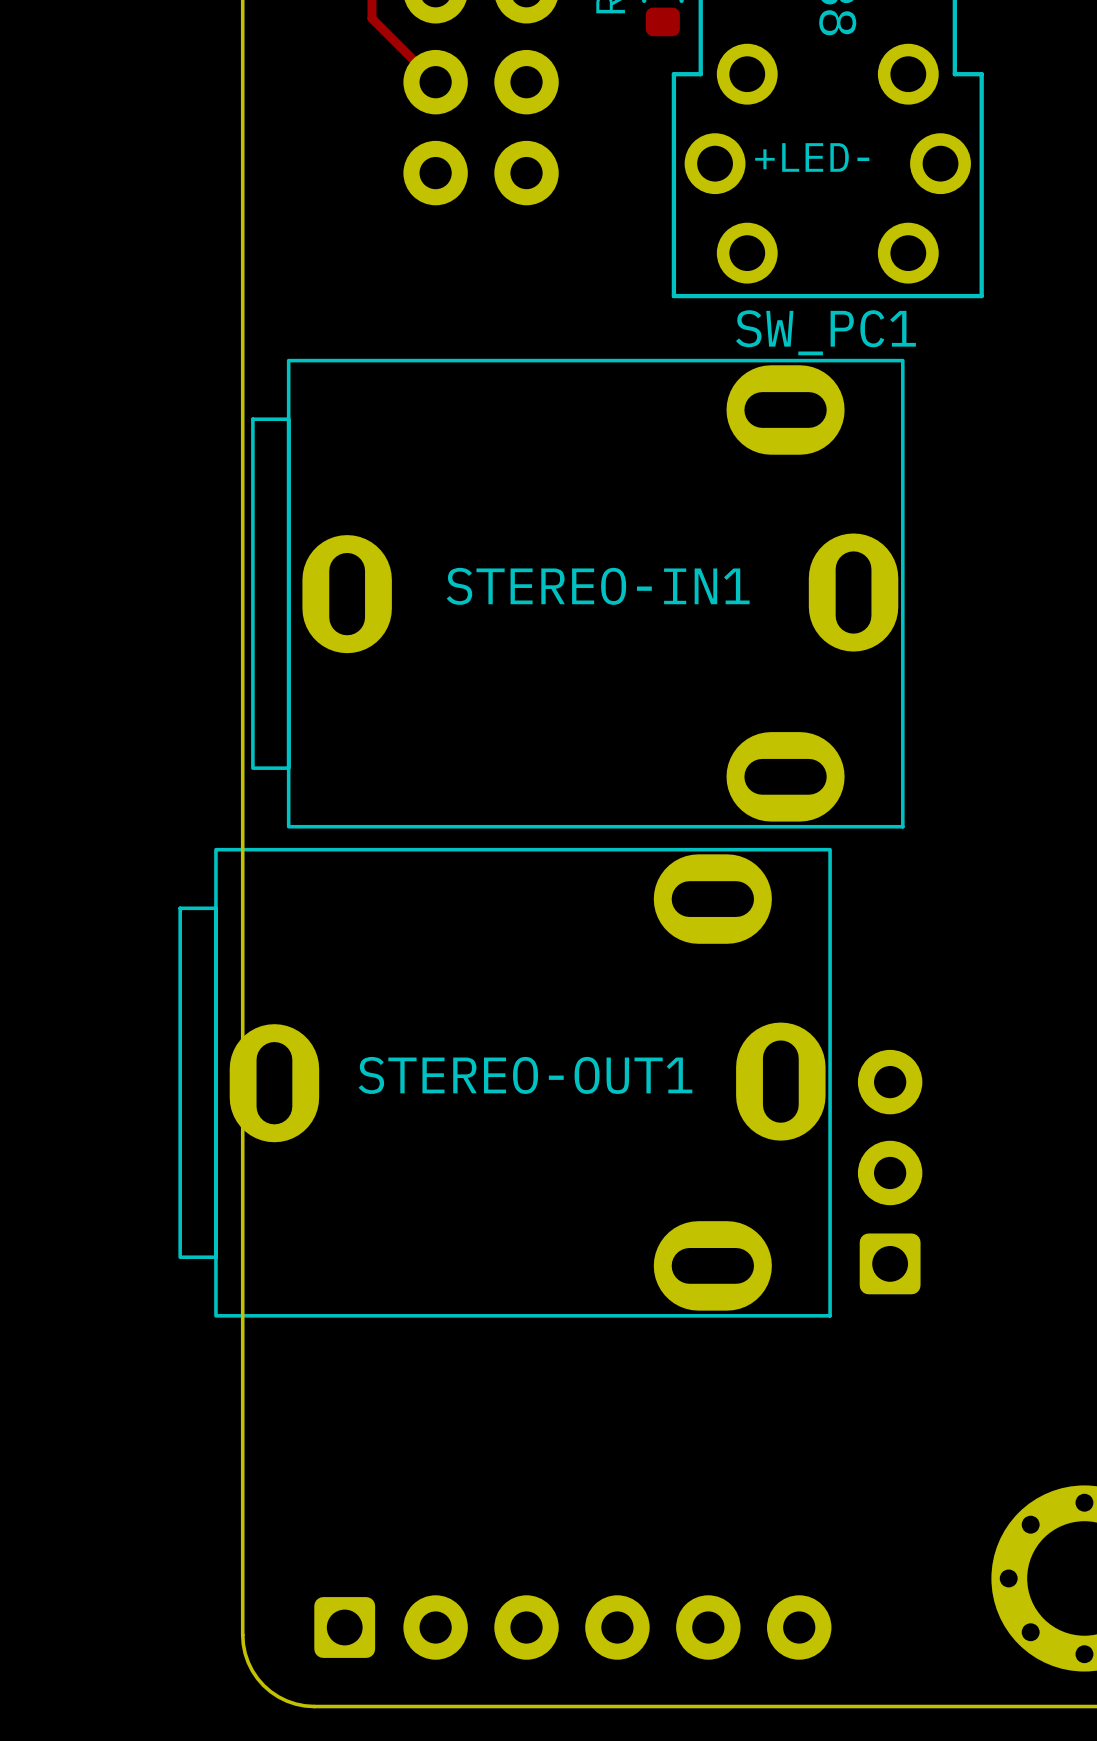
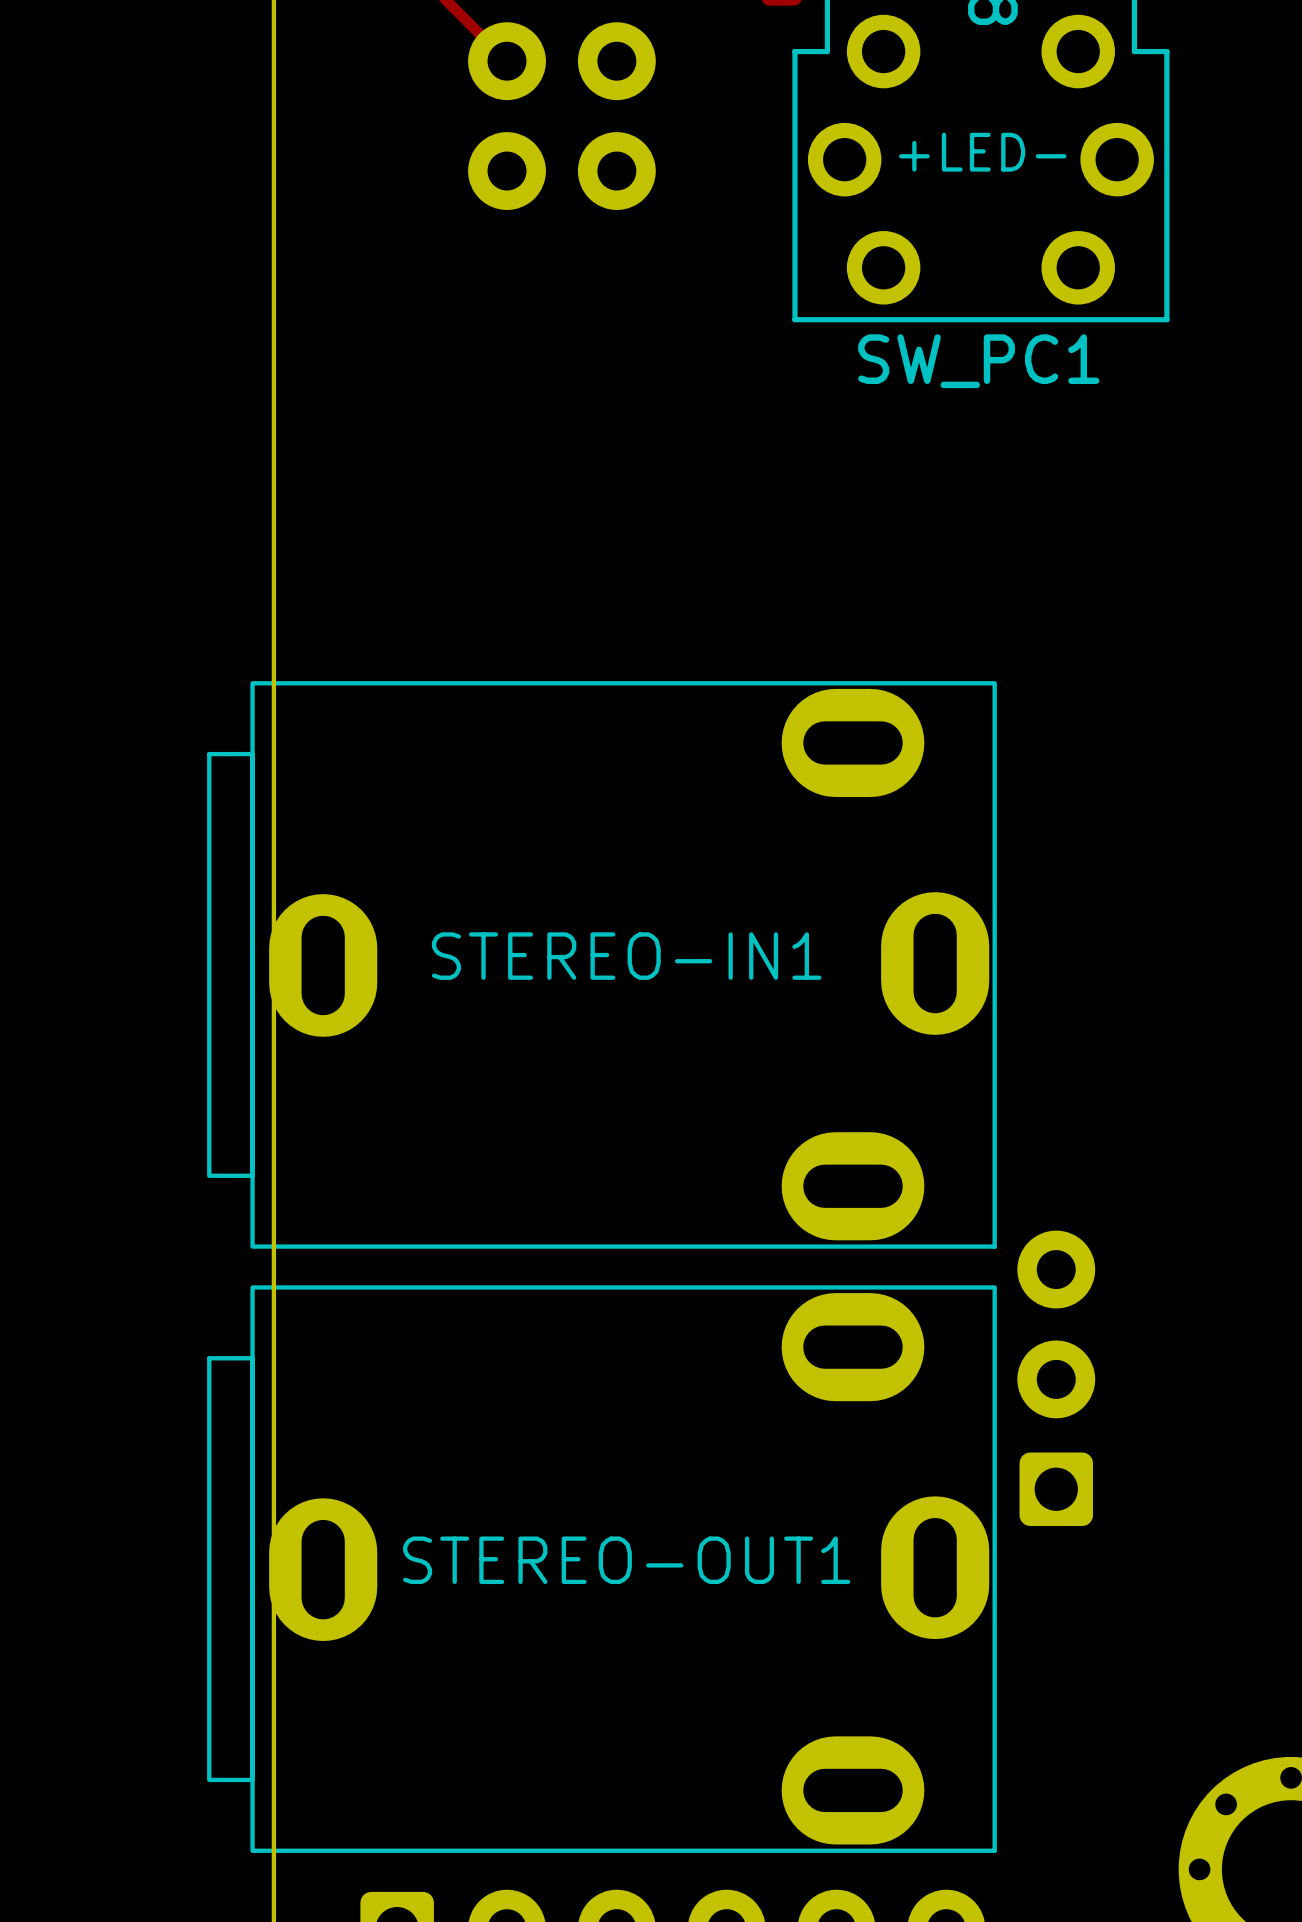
STEREO-IN1 position: (577, 593) -> (601, 964)
STEREO-OUT1 position: (505, 1082) -> (601, 1569)

